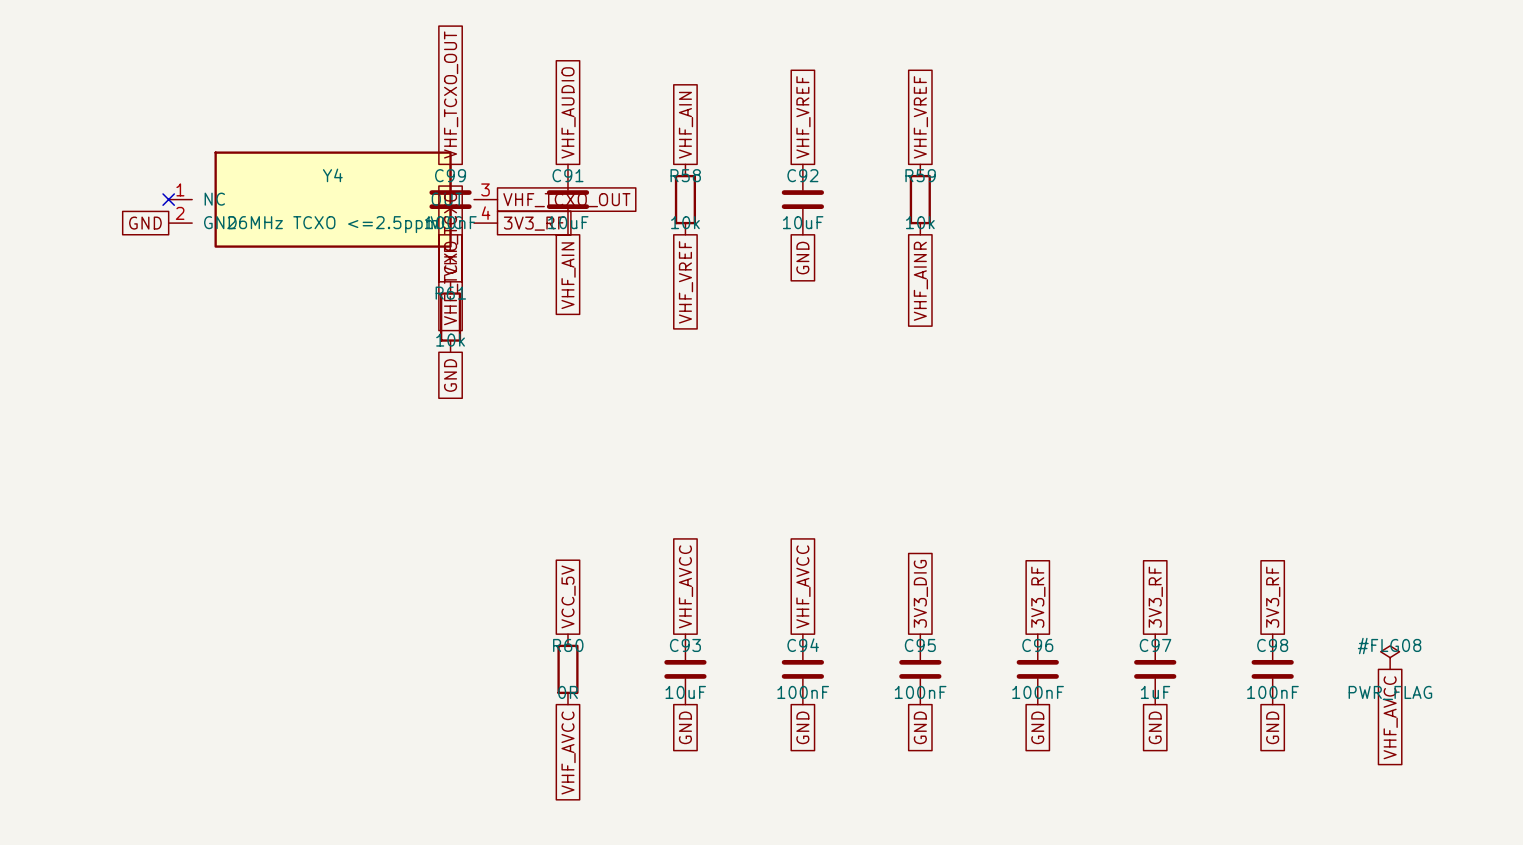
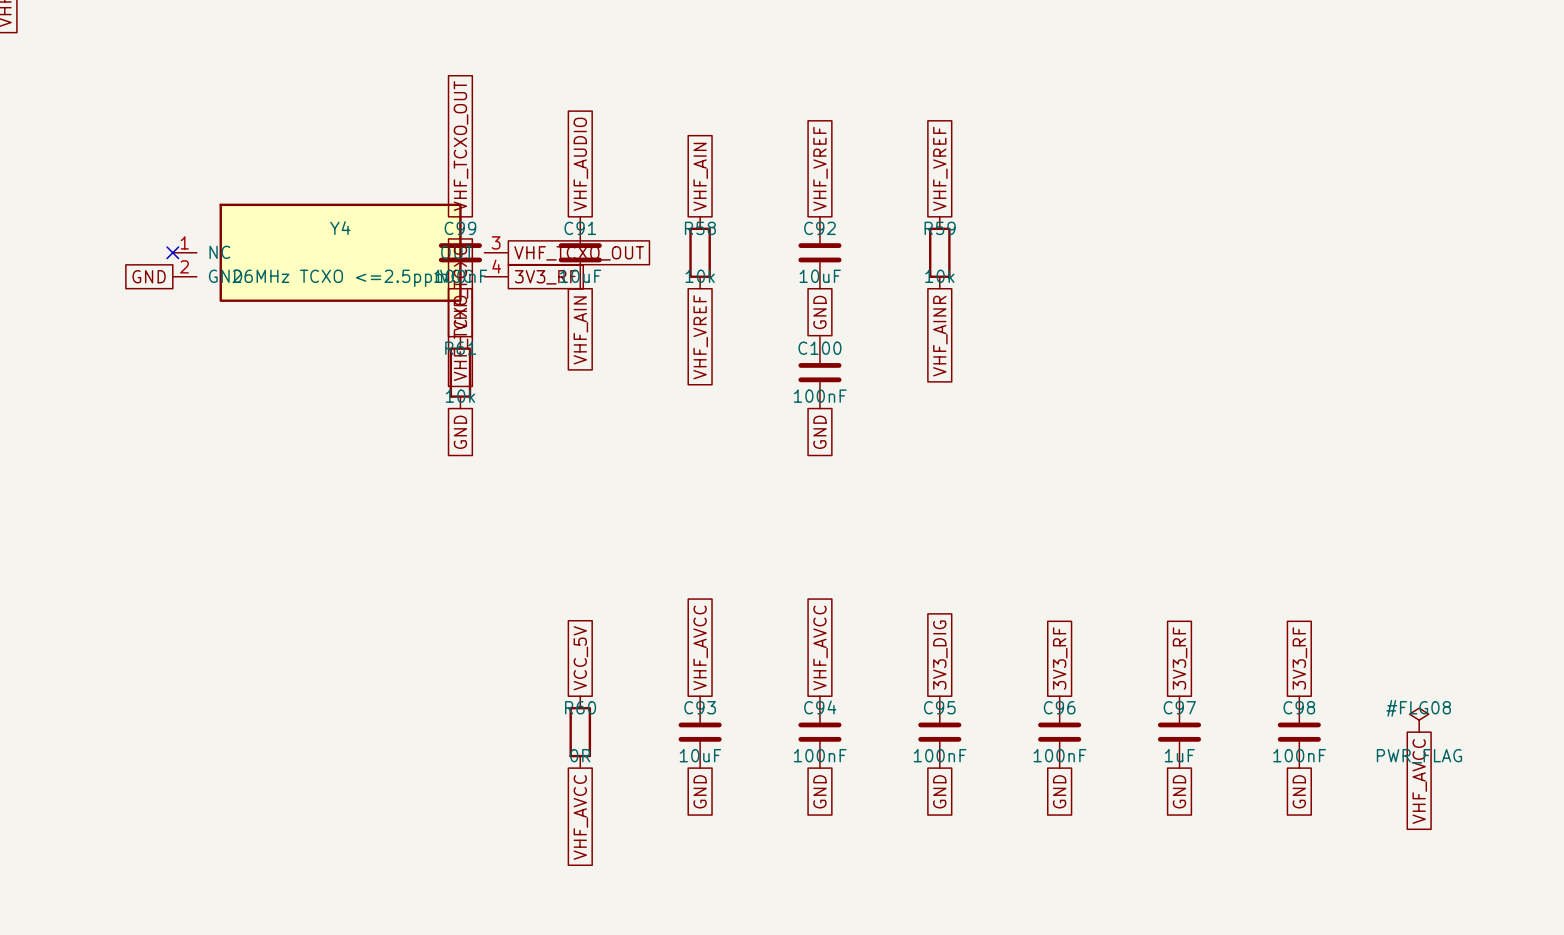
C100: none -> 100nF (819, 372)
global label: none -> GND (819, 432)

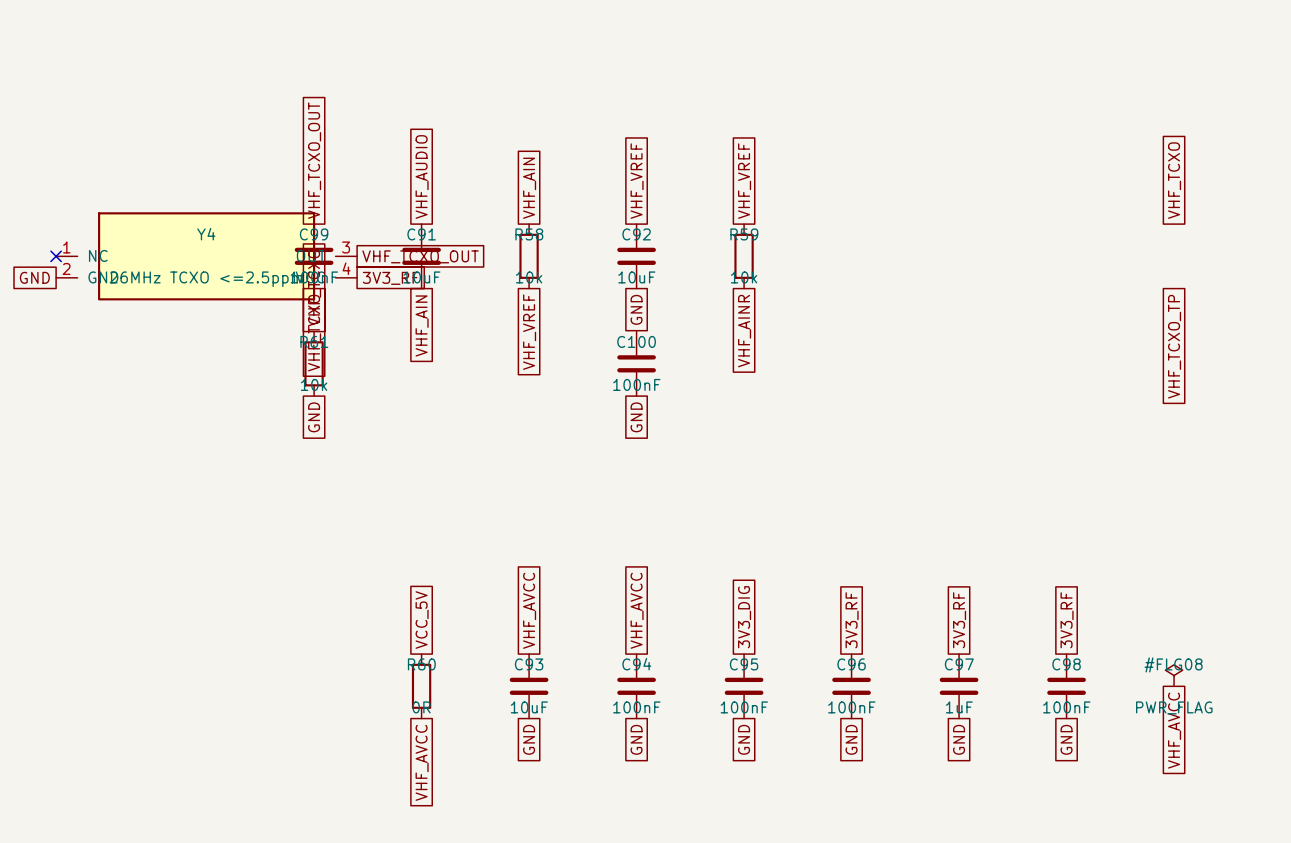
global label: none -> VHF_TCXO (1174, 180)
global label: none -> VHF_TCXO_TP (1174, 346)

